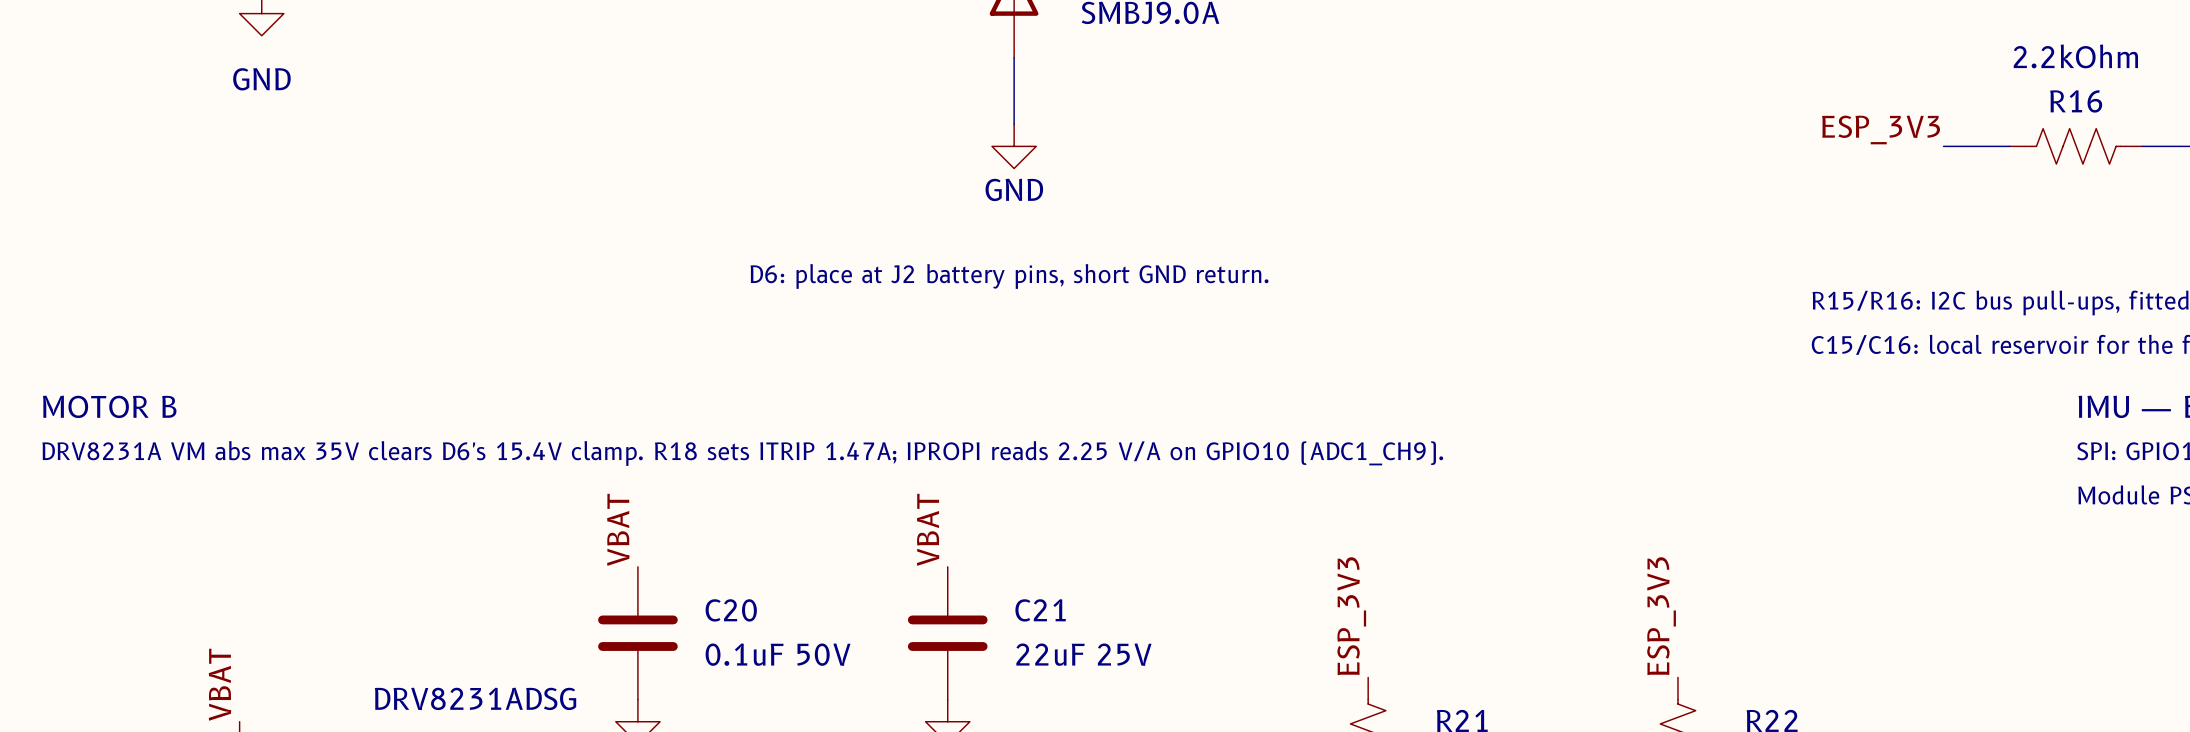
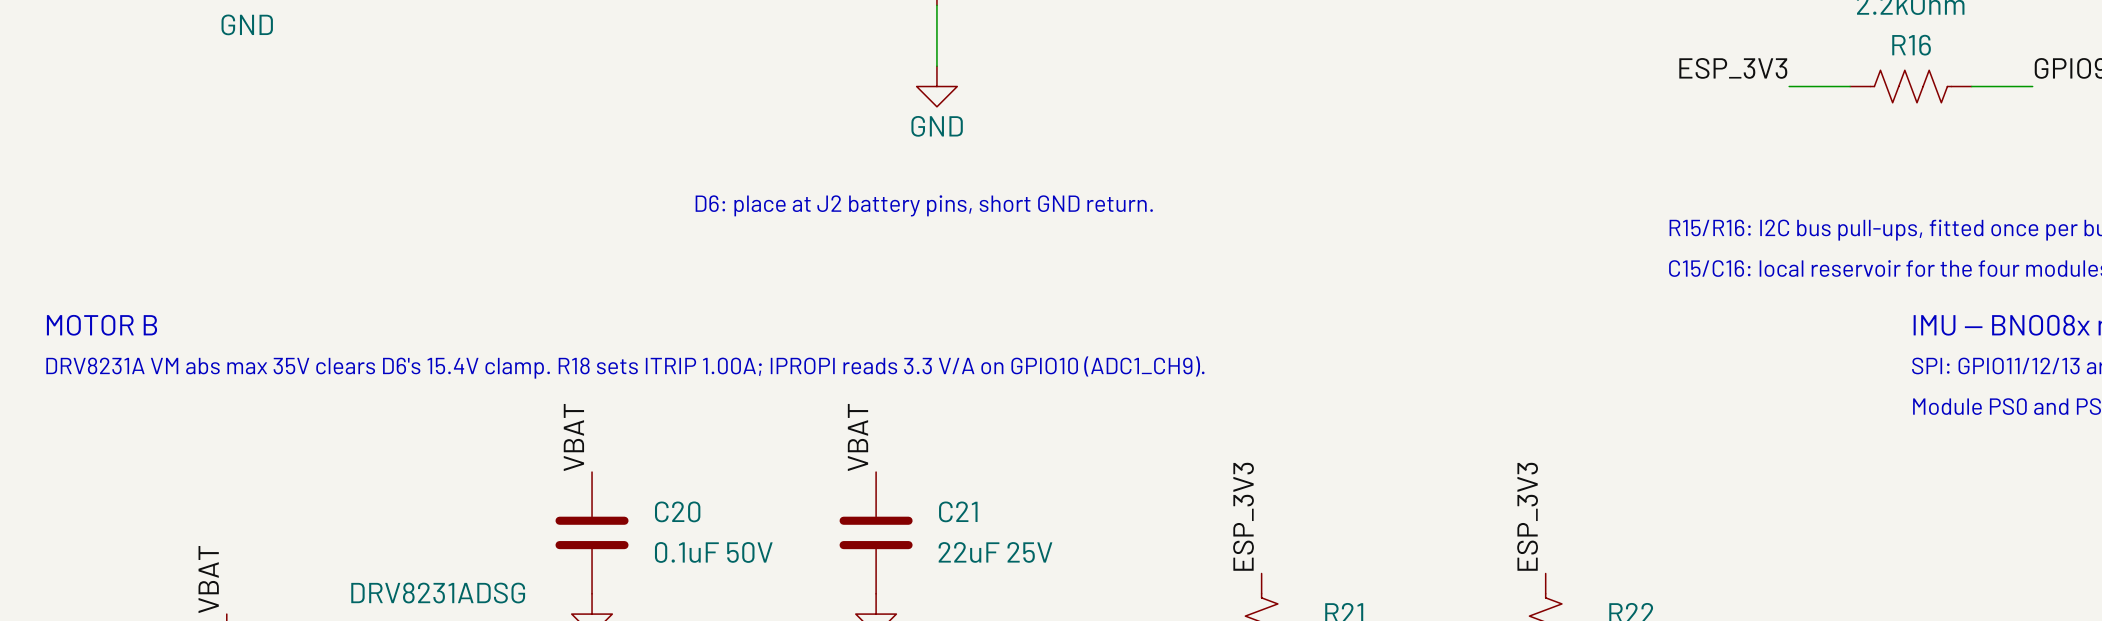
text: DRV8231A VM abs max 35V clears D6's 15.4V clamp. R18 sets ITRIP 1.47A; IPROPI reads 2.25 V/A on GPIO10 (ADC1_CH9). (742, 453) -> DRV8231A VM abs max 35V clears D6's 15.4V clamp. R18 sets ITRIP 1.00A; IPROPI reads 3.3 V/A on GPIO10 (ADC1_CH9). (625, 367)

